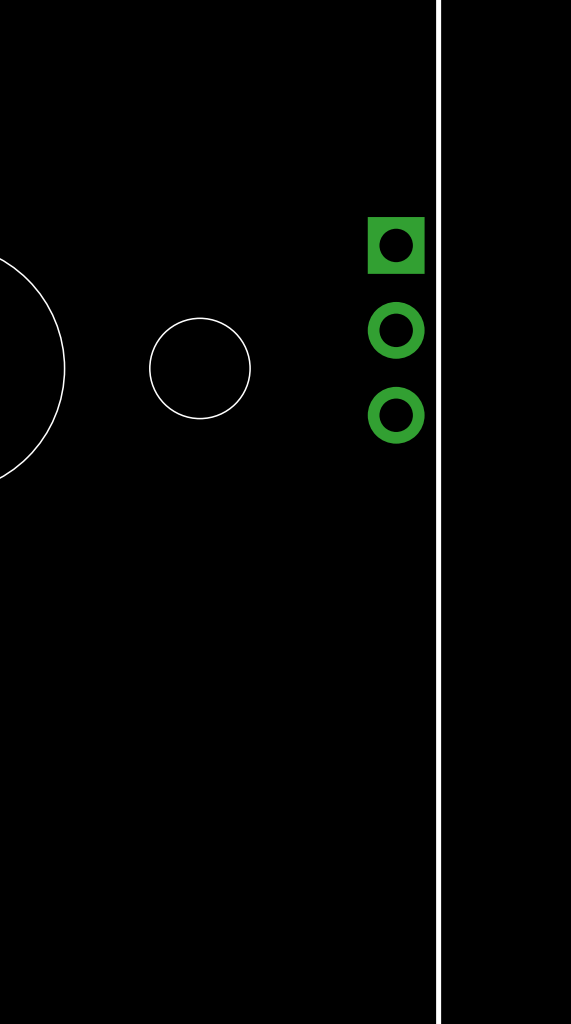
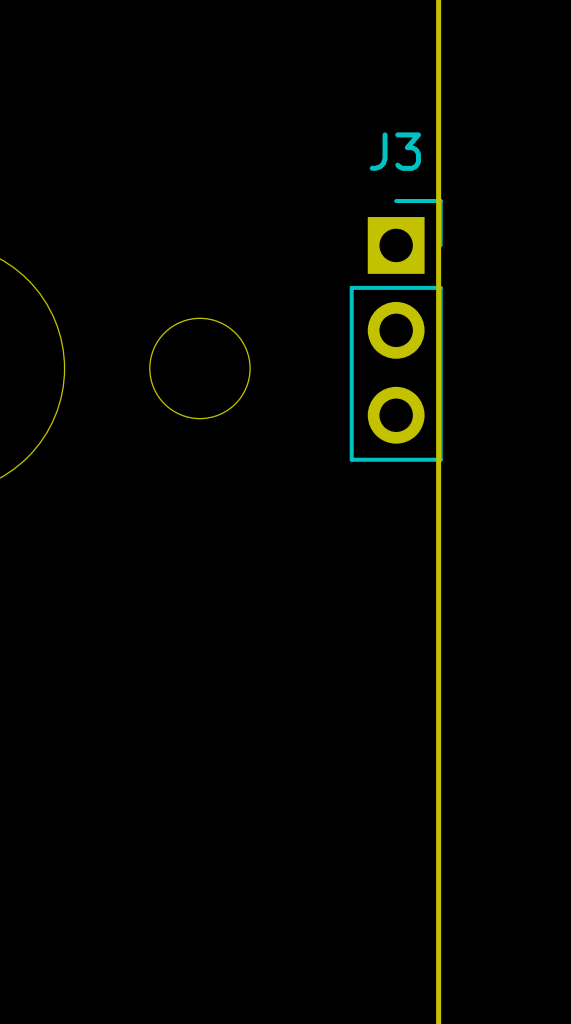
J3 side: bottom (396, 330) -> top (396, 330)

